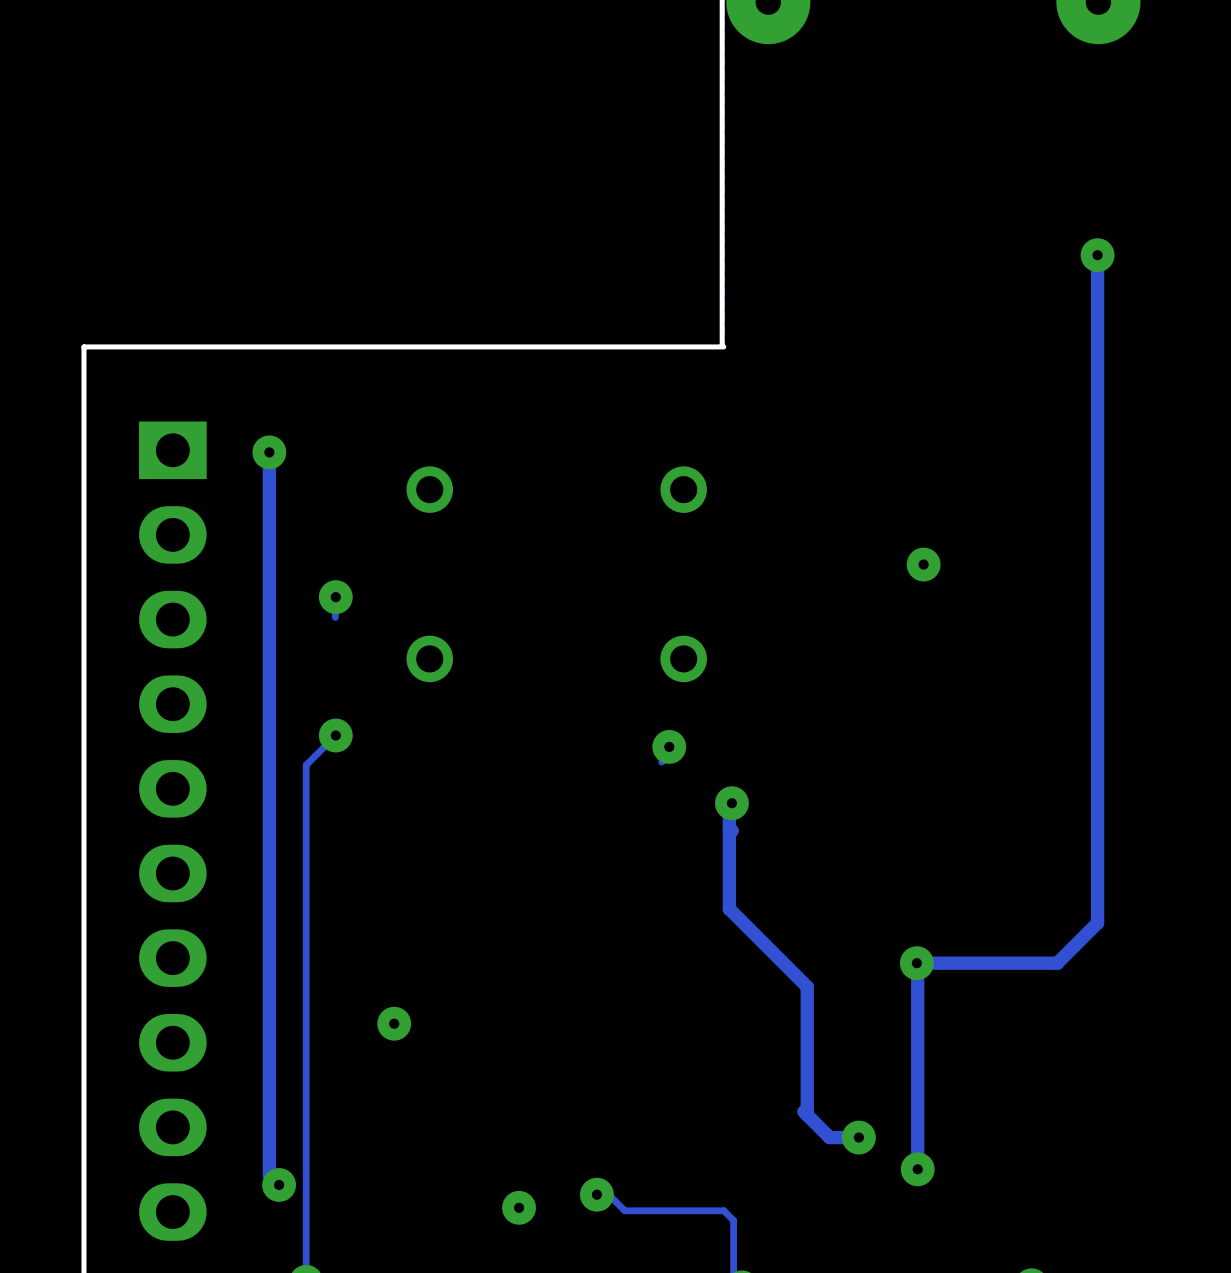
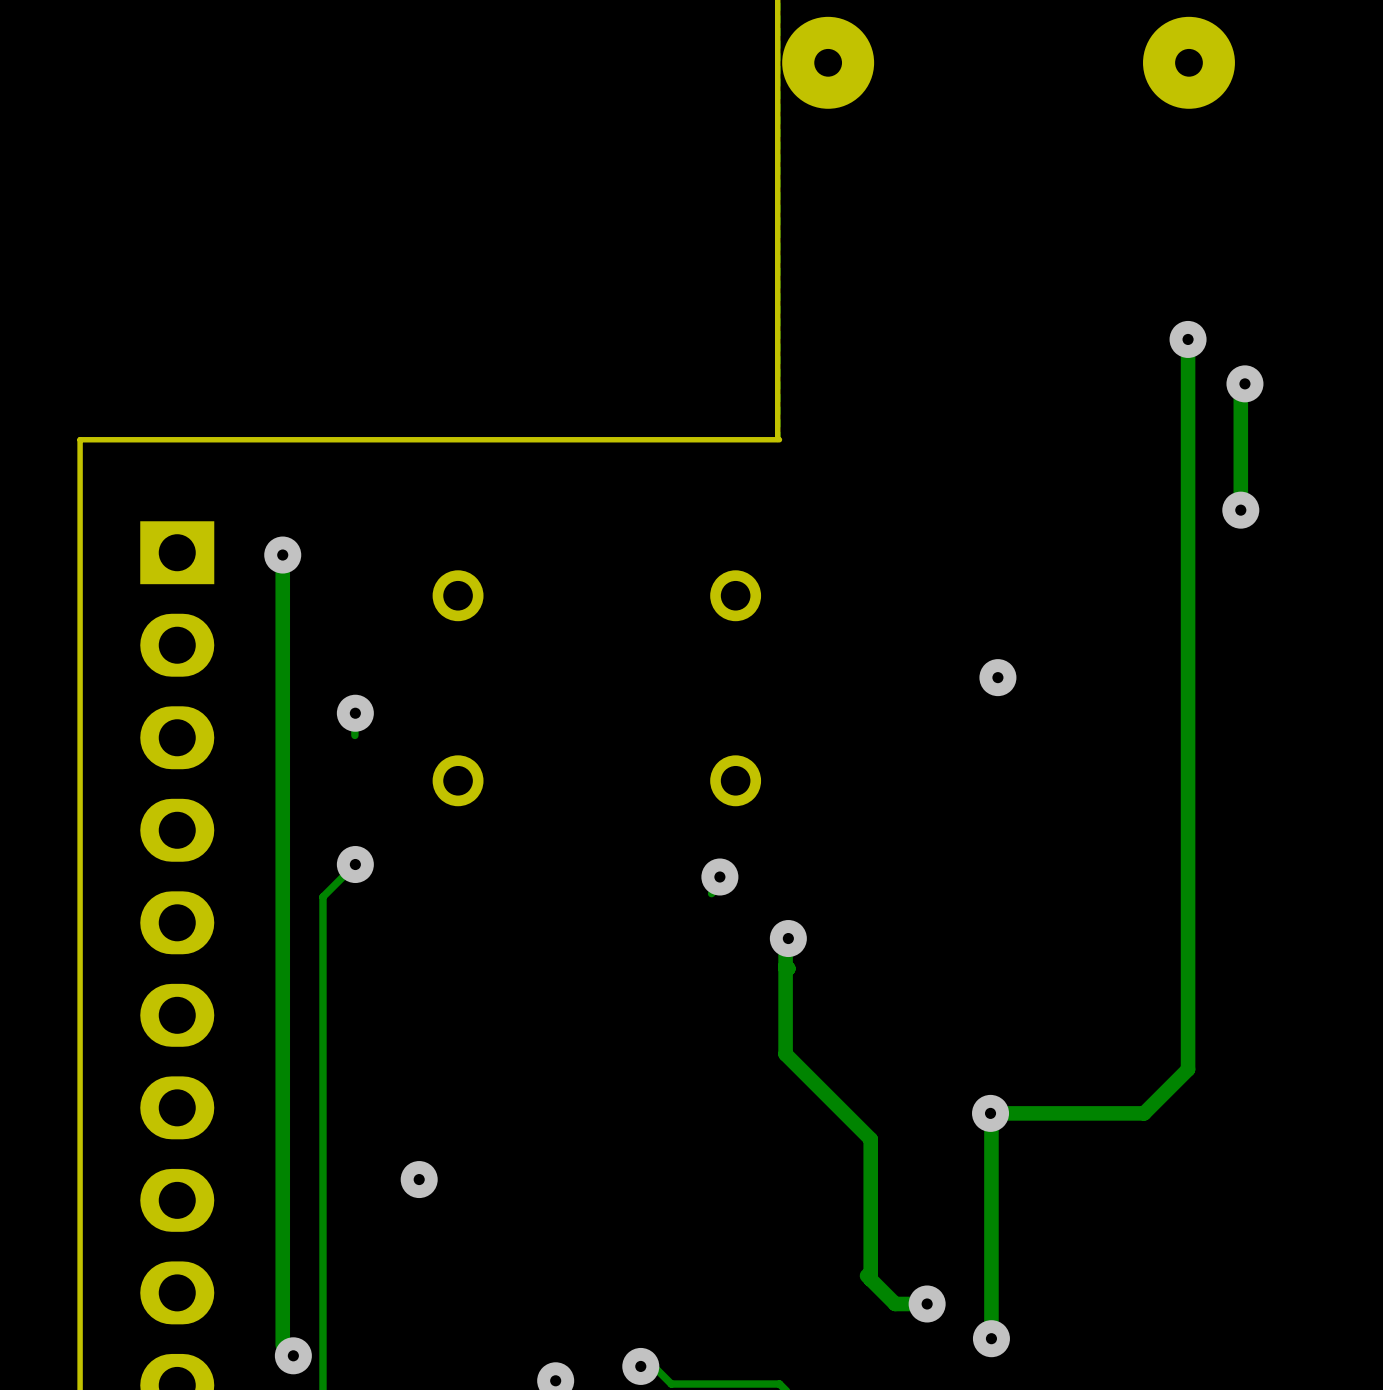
track: none -> (1244, 383) (1240, 388) (1240, 510)
via: none -> (1244, 383)
via: none -> (1240, 510)

